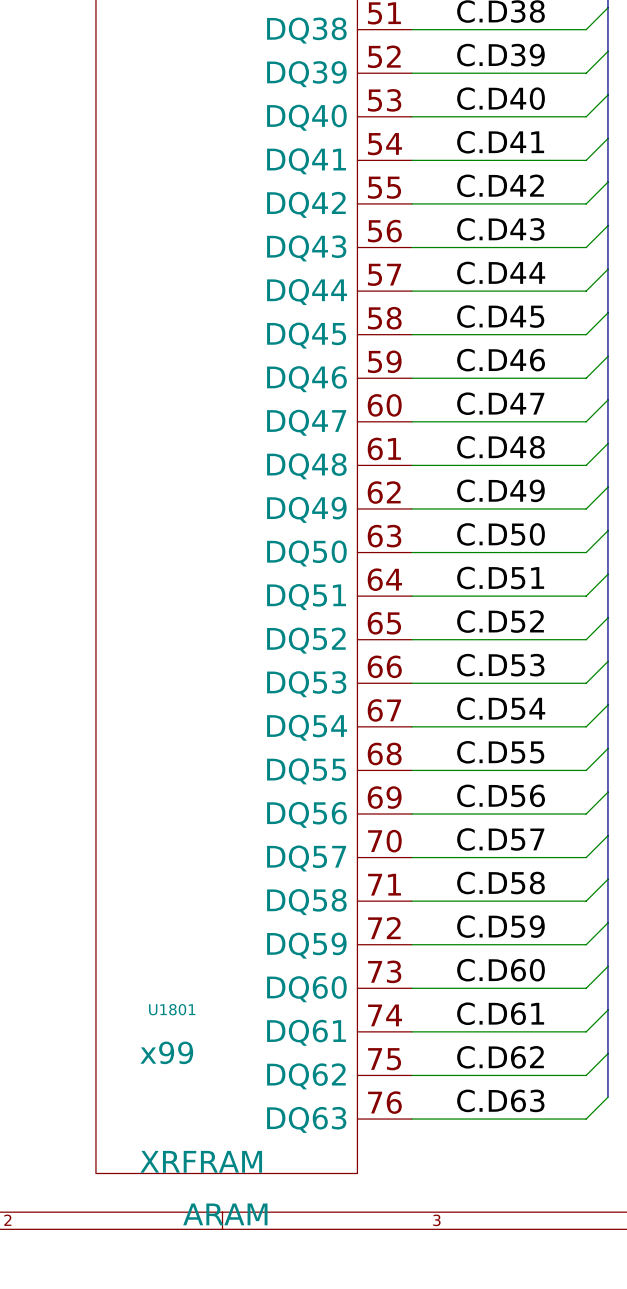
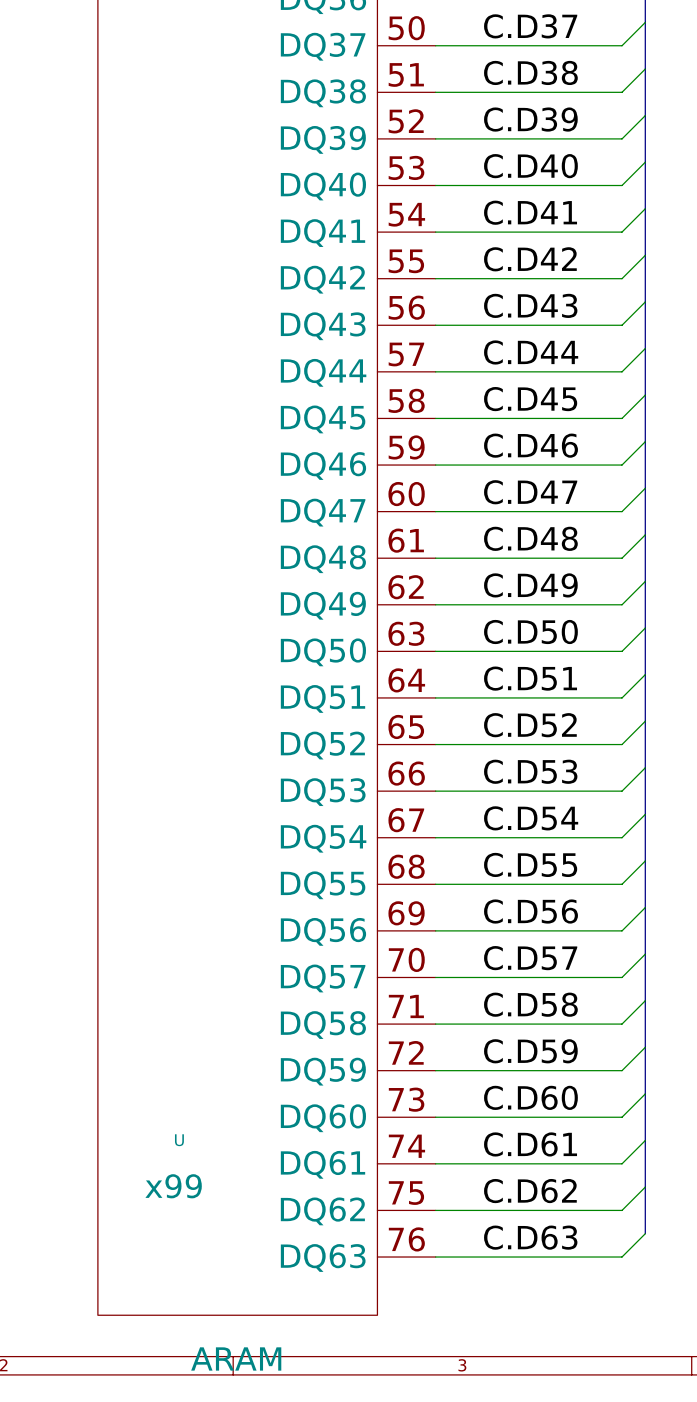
U1801 name: U1801 (172, 1009) -> U (179, 1140)
U1801 value: XRFRAM (201, 1161) -> none

